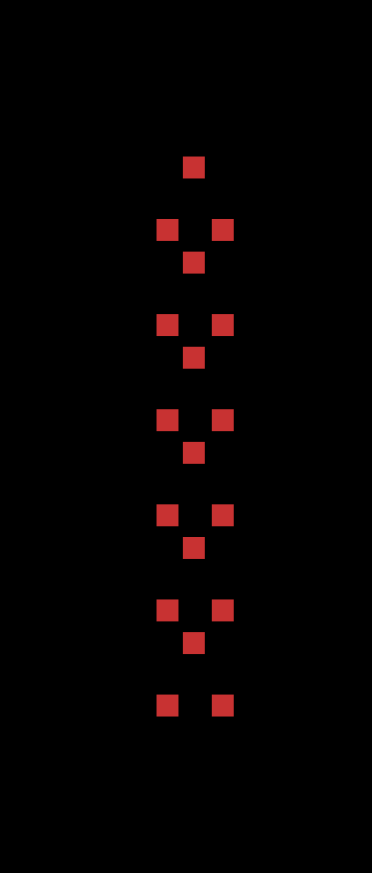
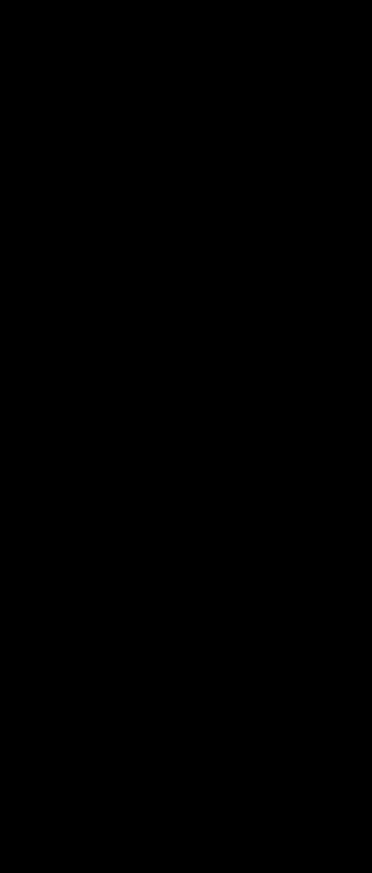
part: (195, 198) -> none
part: (195, 293) -> none
part: (195, 388) -> none
part: (195, 484) -> none
part: (195, 579) -> none
part: (195, 674) -> none

